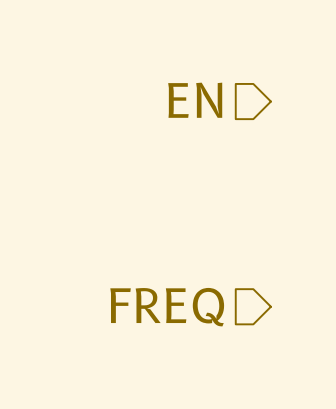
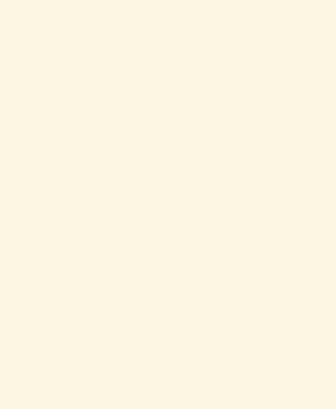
hierarchical label: EN (195, 100) -> none
hierarchical label: FREQ (167, 307) -> none

